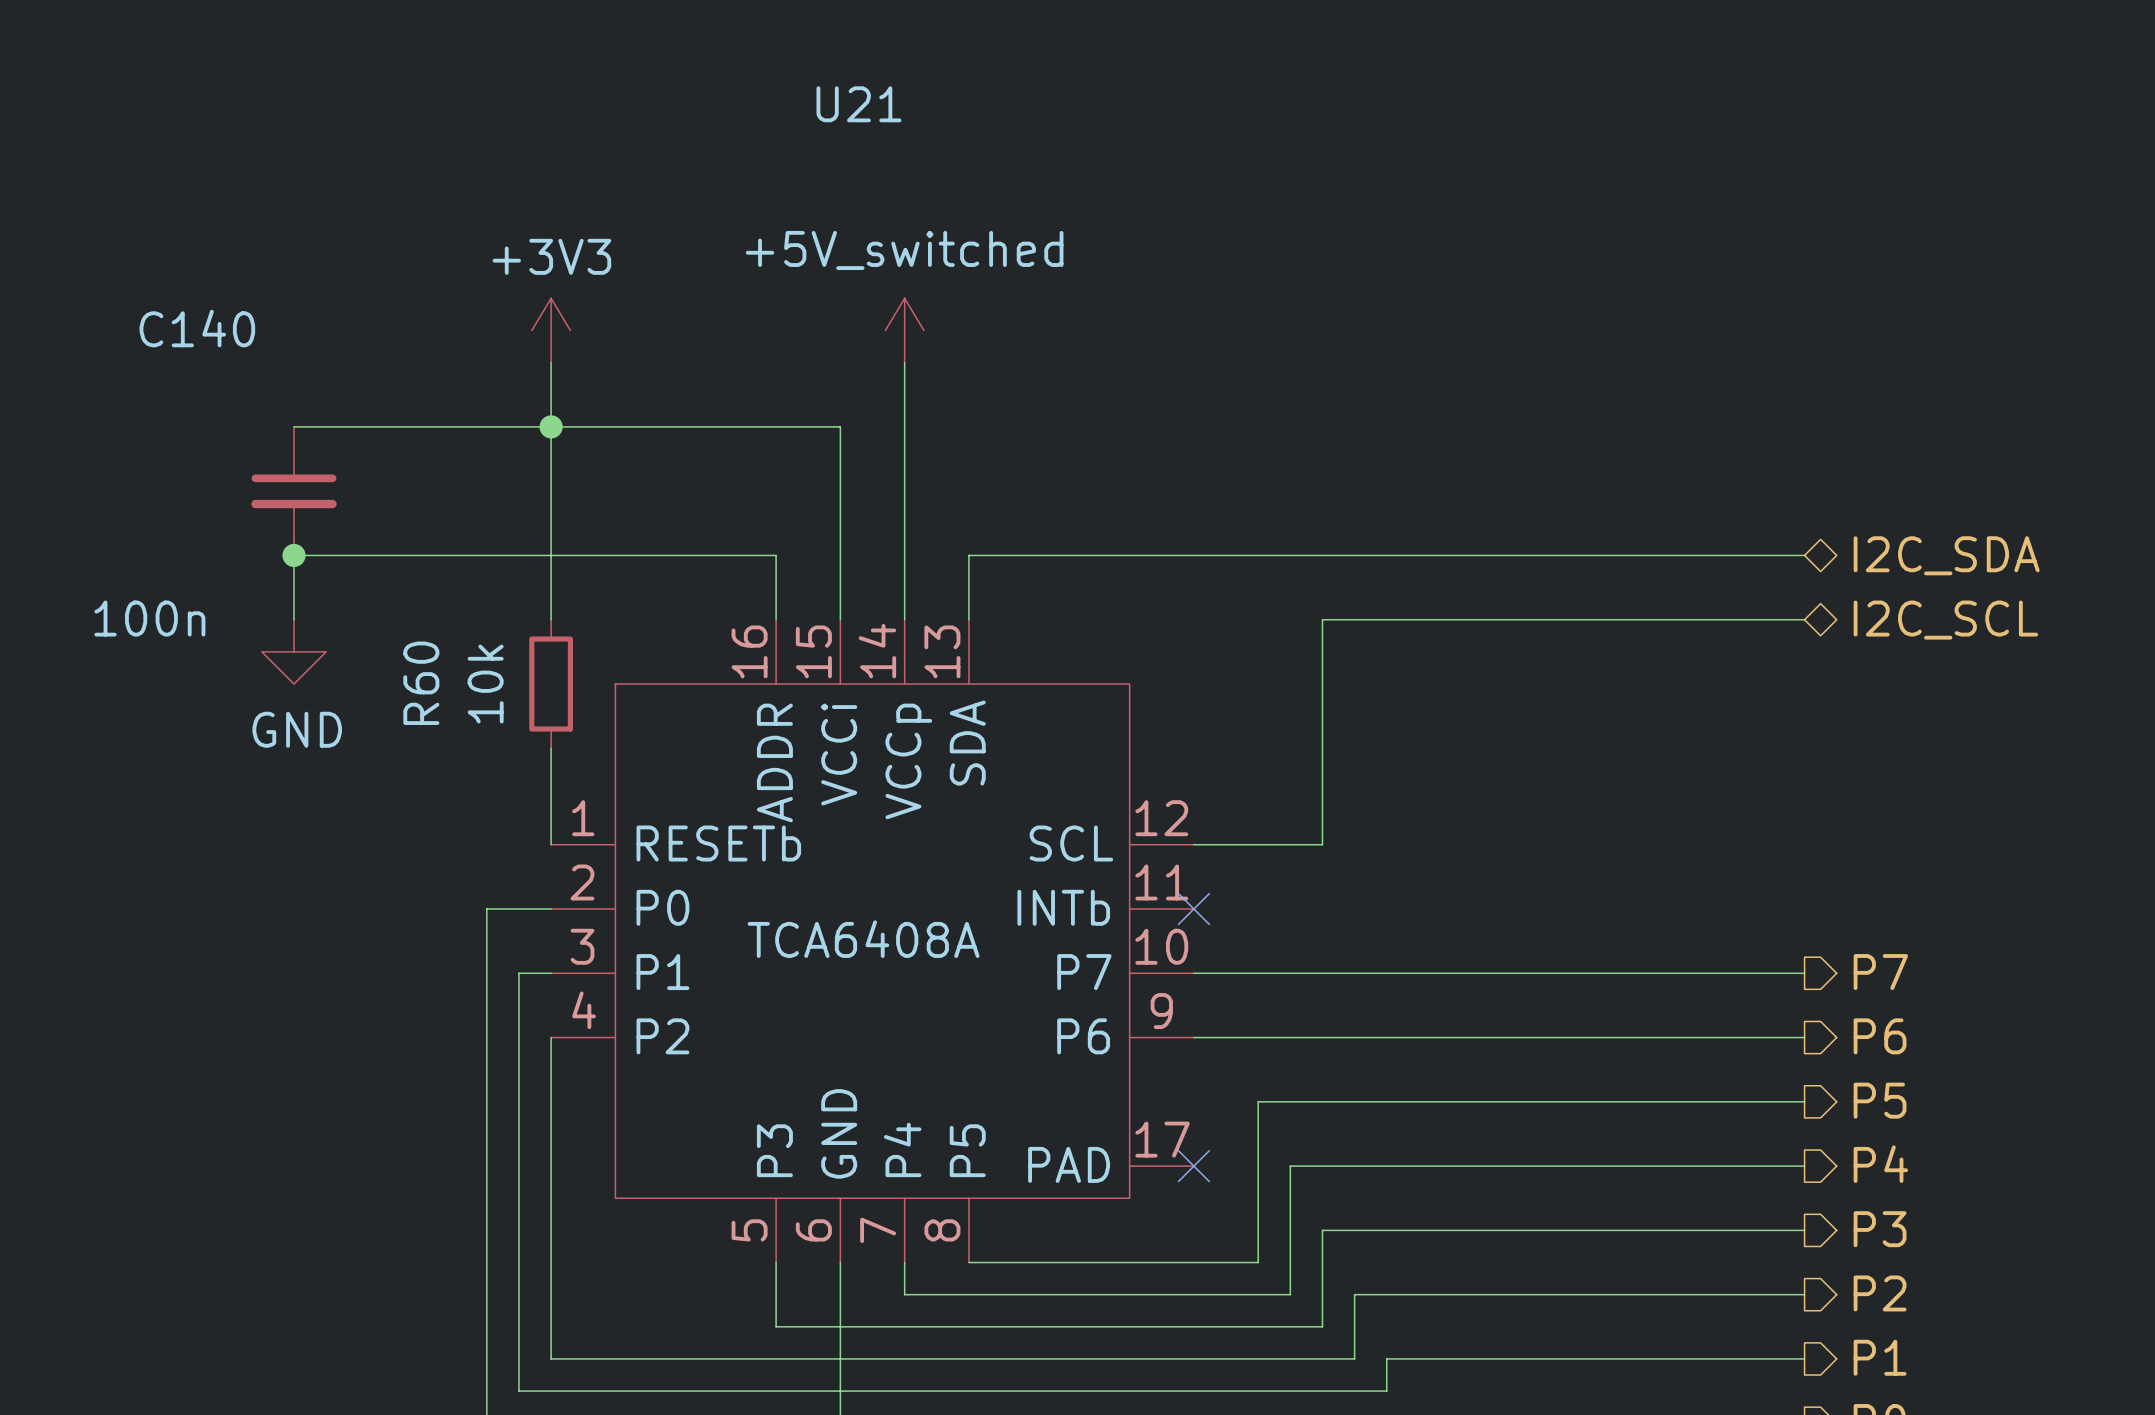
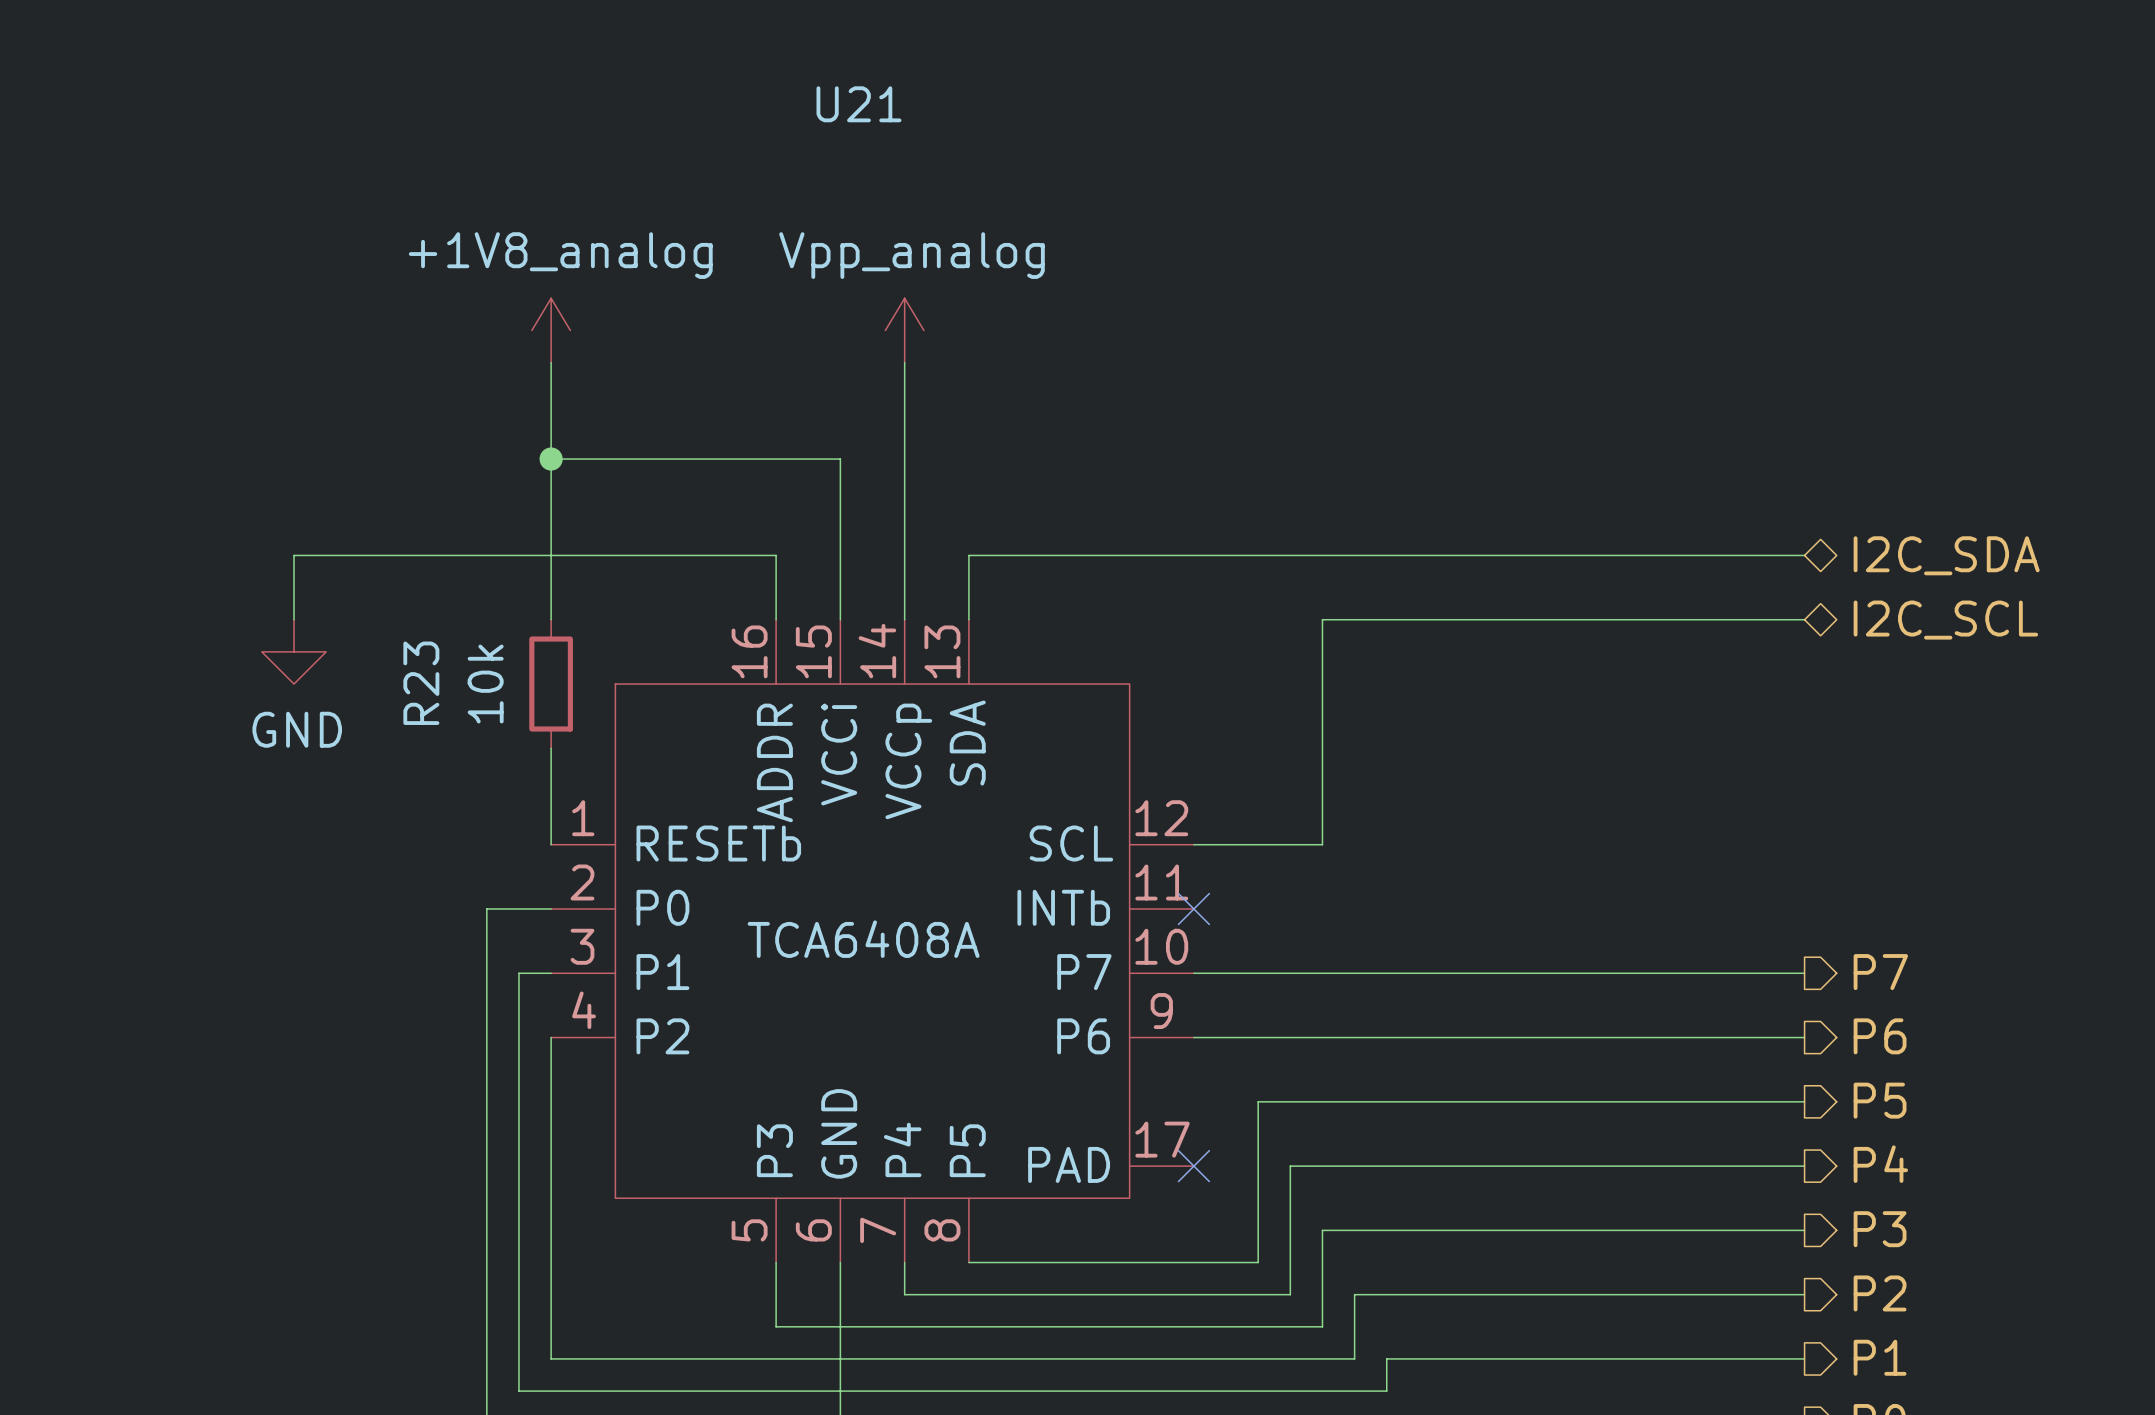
power symbol: +3V3 (551, 330) -> +1V8_analog (551, 330)
power symbol: +5V_switched (904, 330) -> Vpp_analog (904, 330)
wire: (294, 426) (840, 426) (840, 459) -> (551, 459) (840, 459)
junction position: (551, 426) -> (551, 459)
C140: 100n (294, 491) -> none
junction: (294, 555) -> none
R60 name: R60 (421, 683) -> R23 (421, 683)

